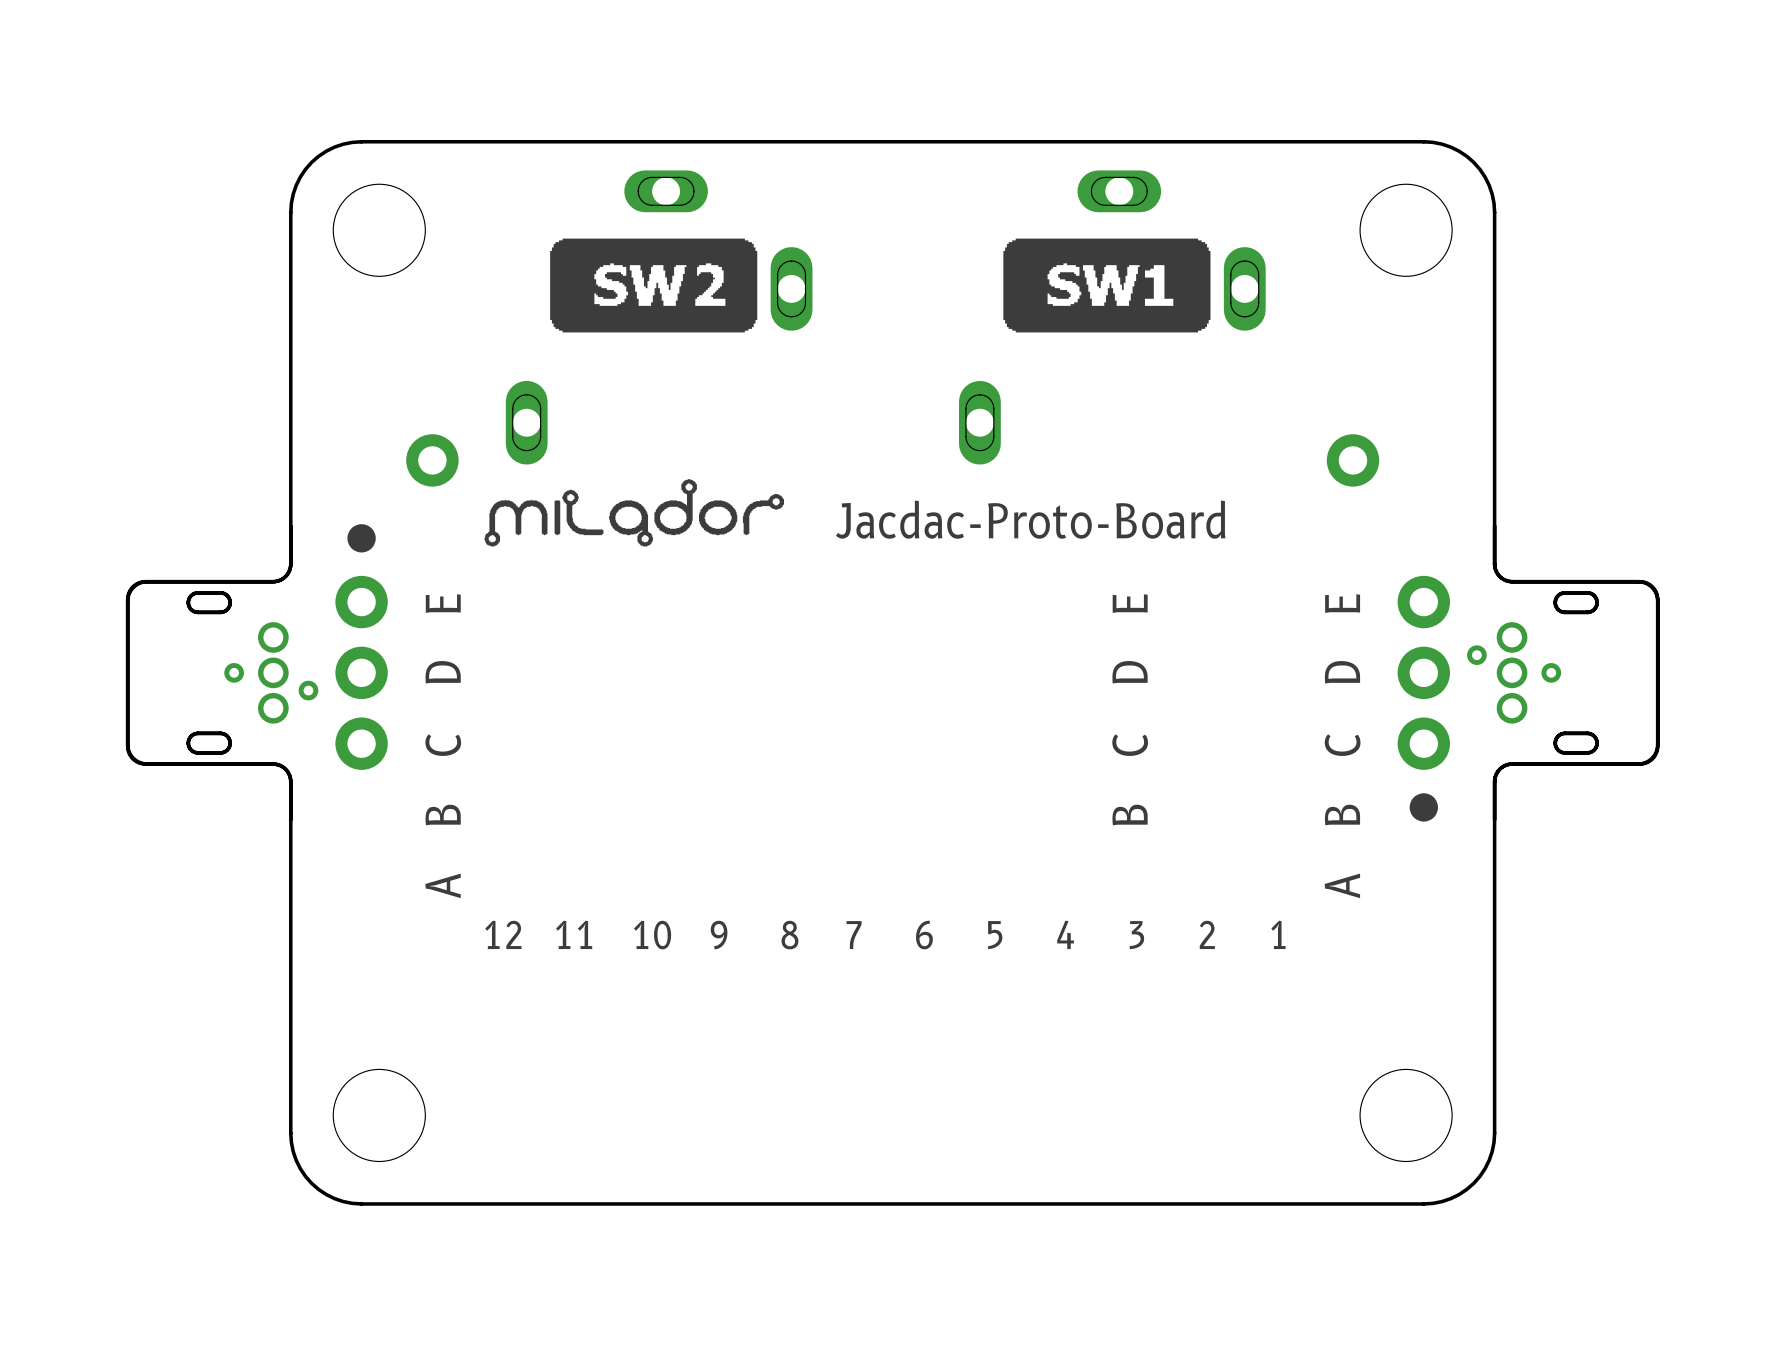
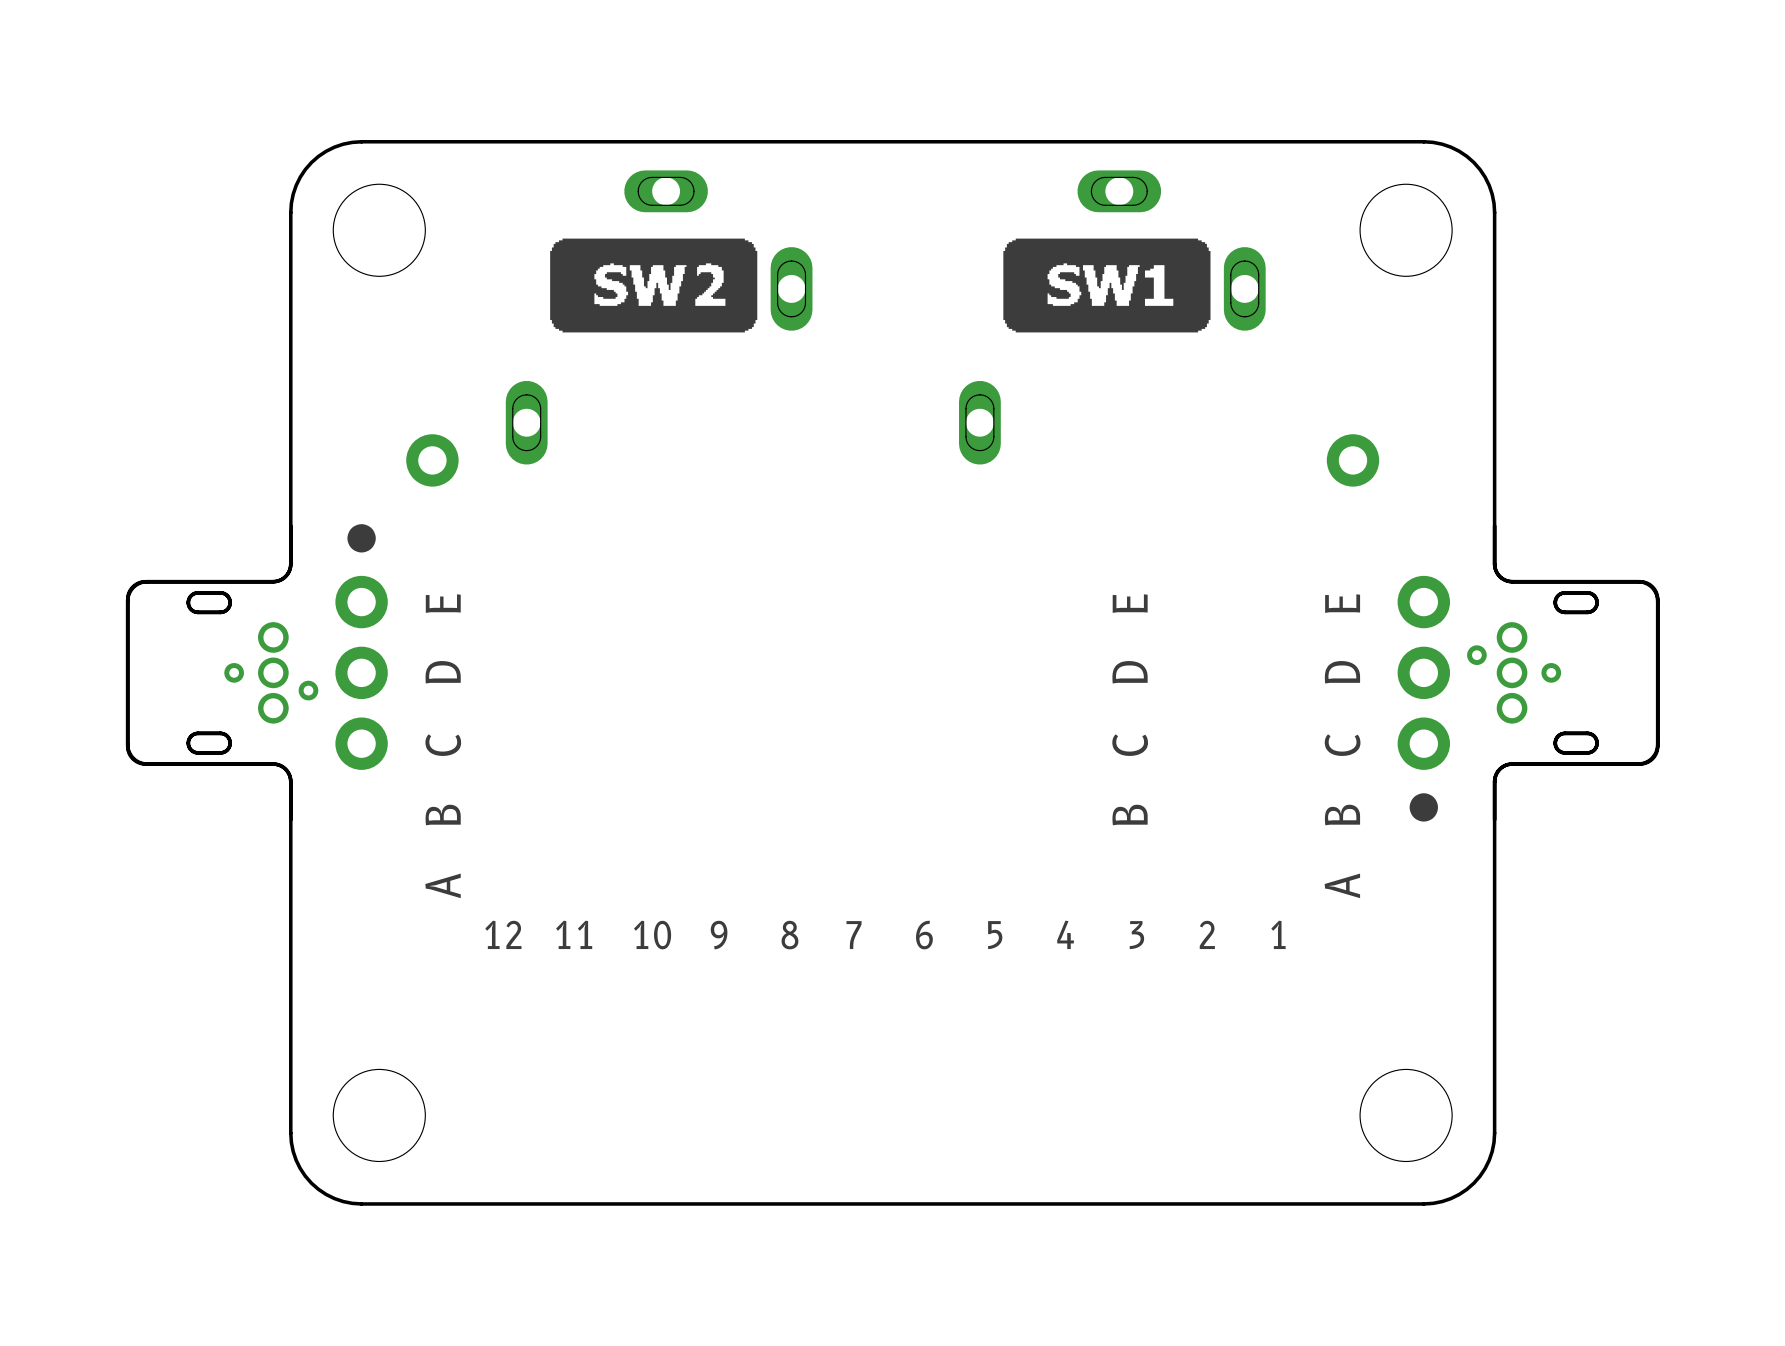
drawing: [484, 479, 785, 547] -> none
text: Jacdac-Proto-Board (1030, 519) -> none

